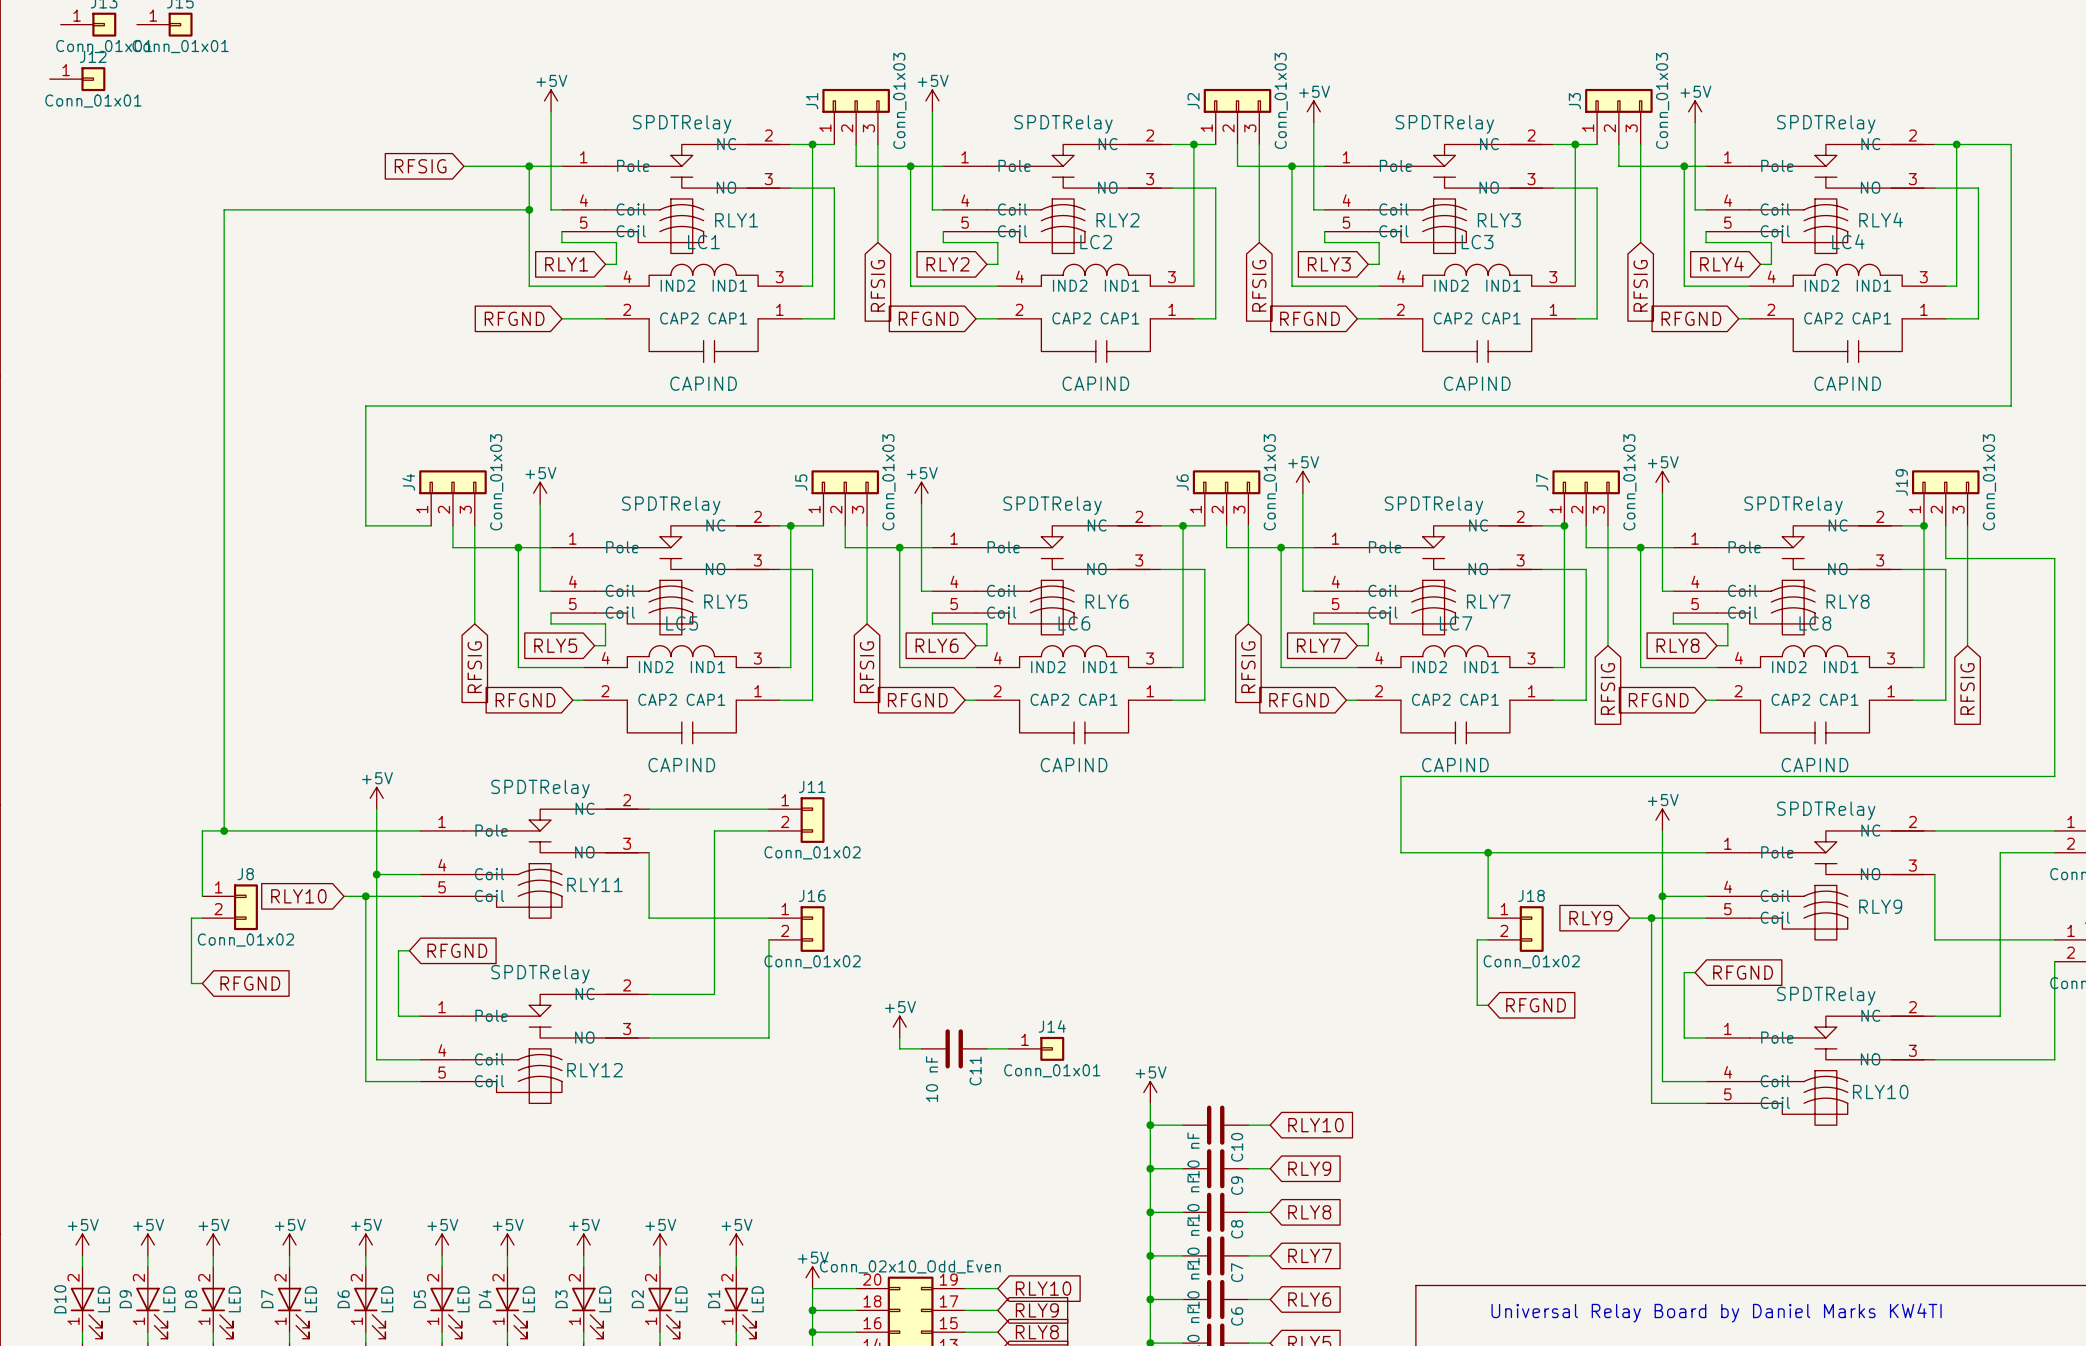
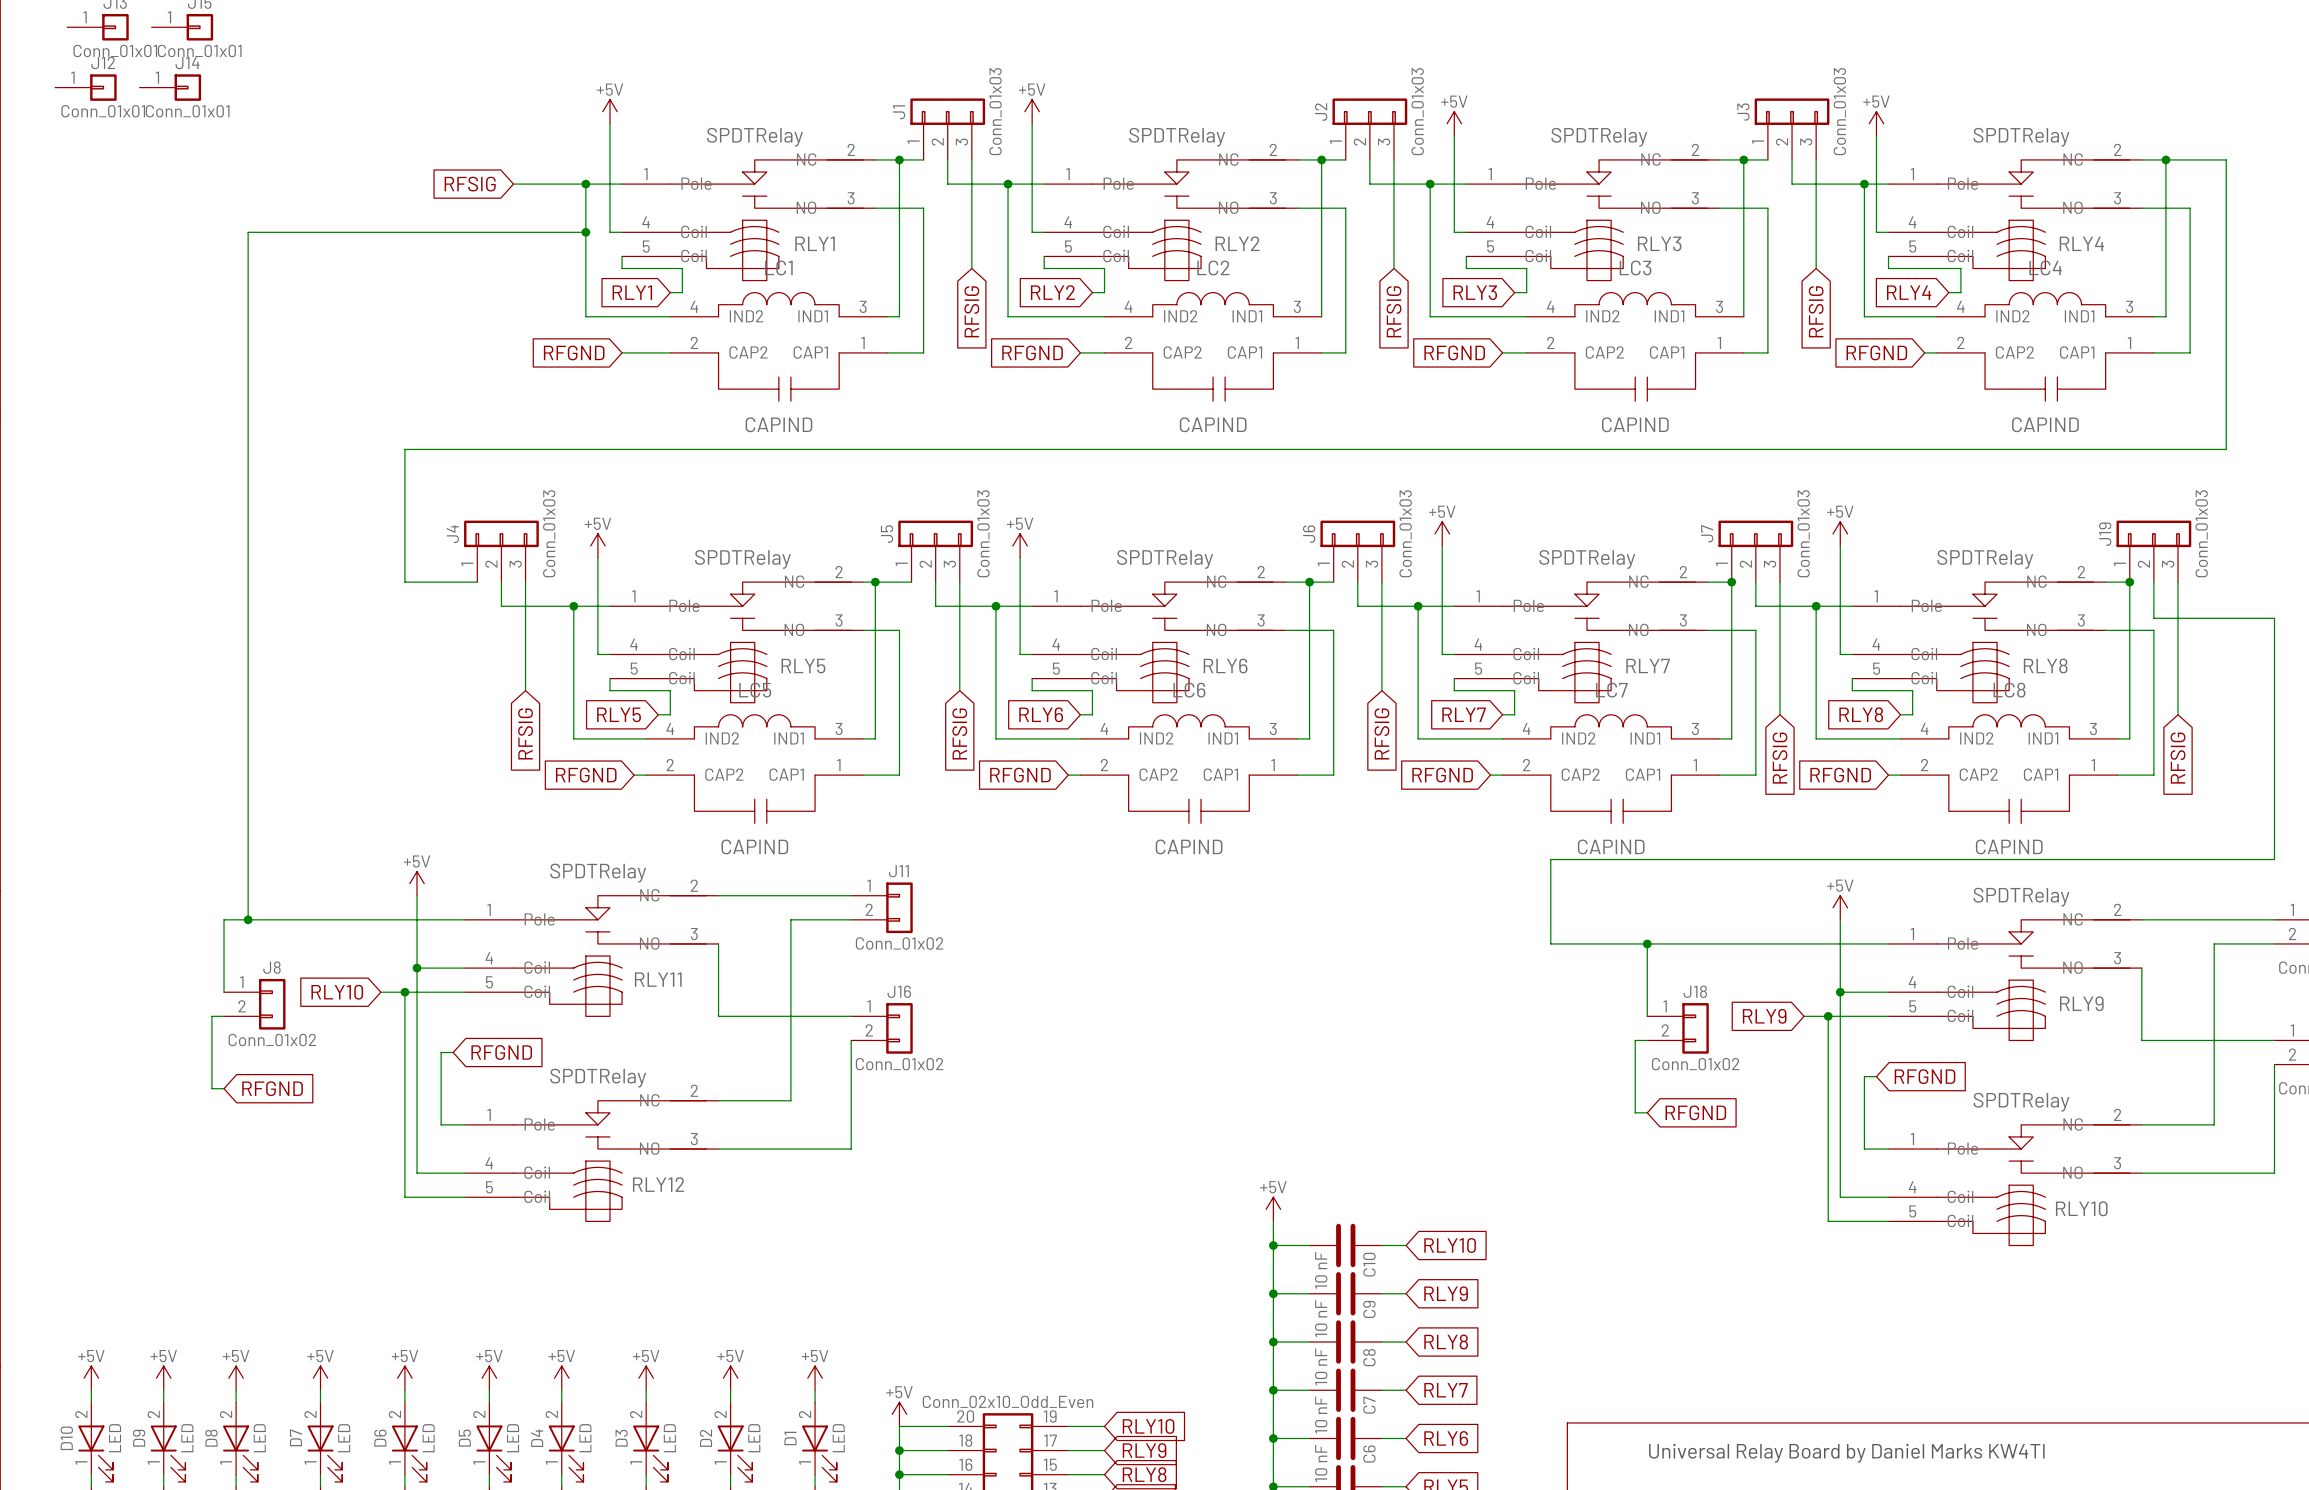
power symbol: +5V (899, 1027) -> none
wire: (899, 1037) (899, 1048) (921, 1048) -> none
C11: 10 nF (954, 1048) -> none
wire: (986, 1048) (1008, 1048) -> none
J14 position: (1036, 1048) -> (170, 87)

